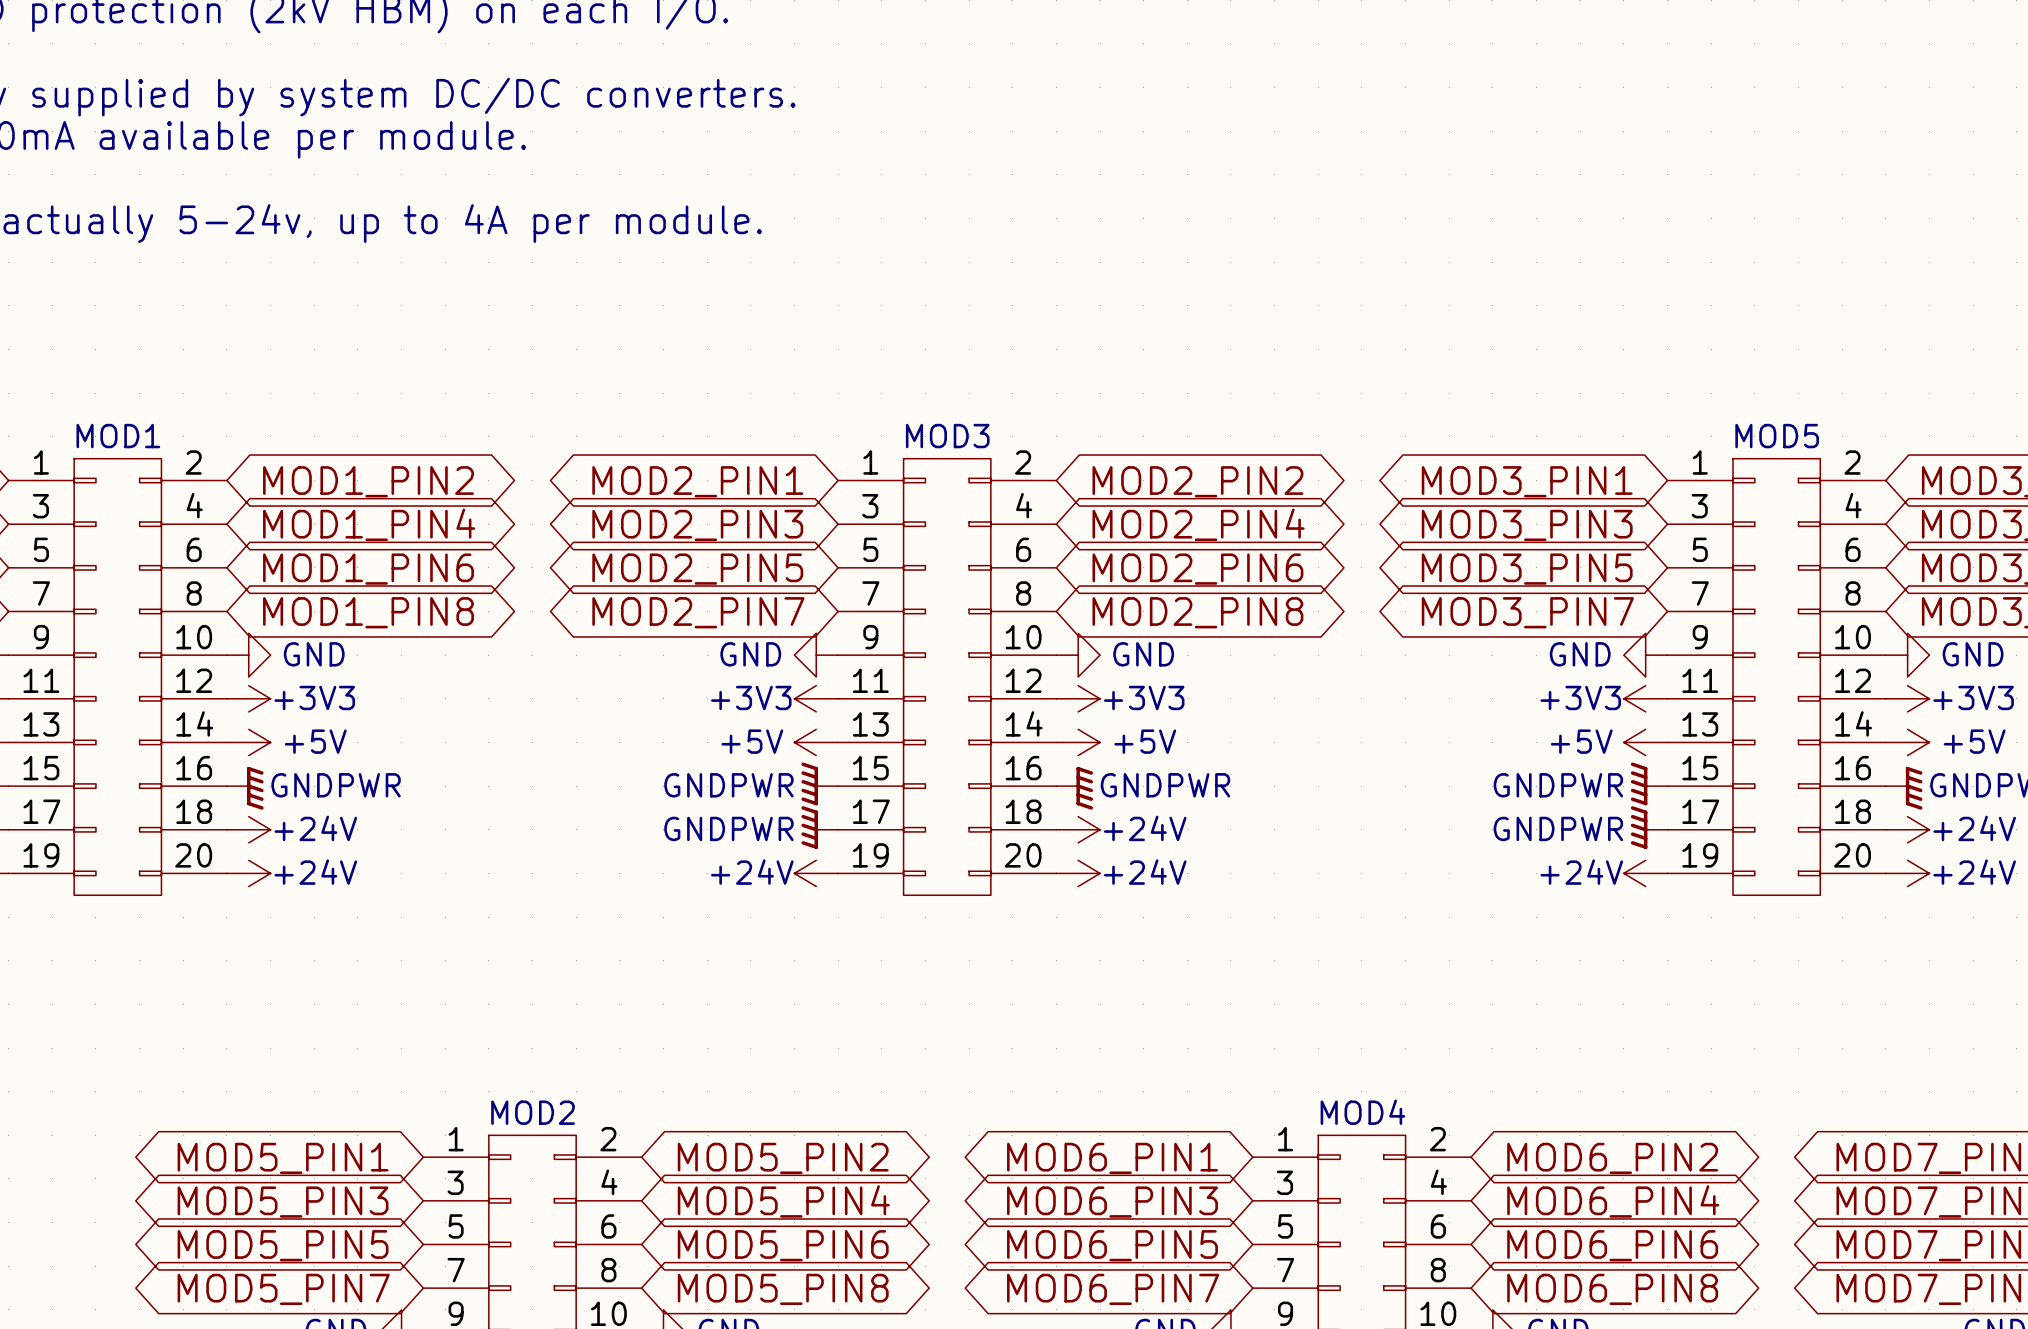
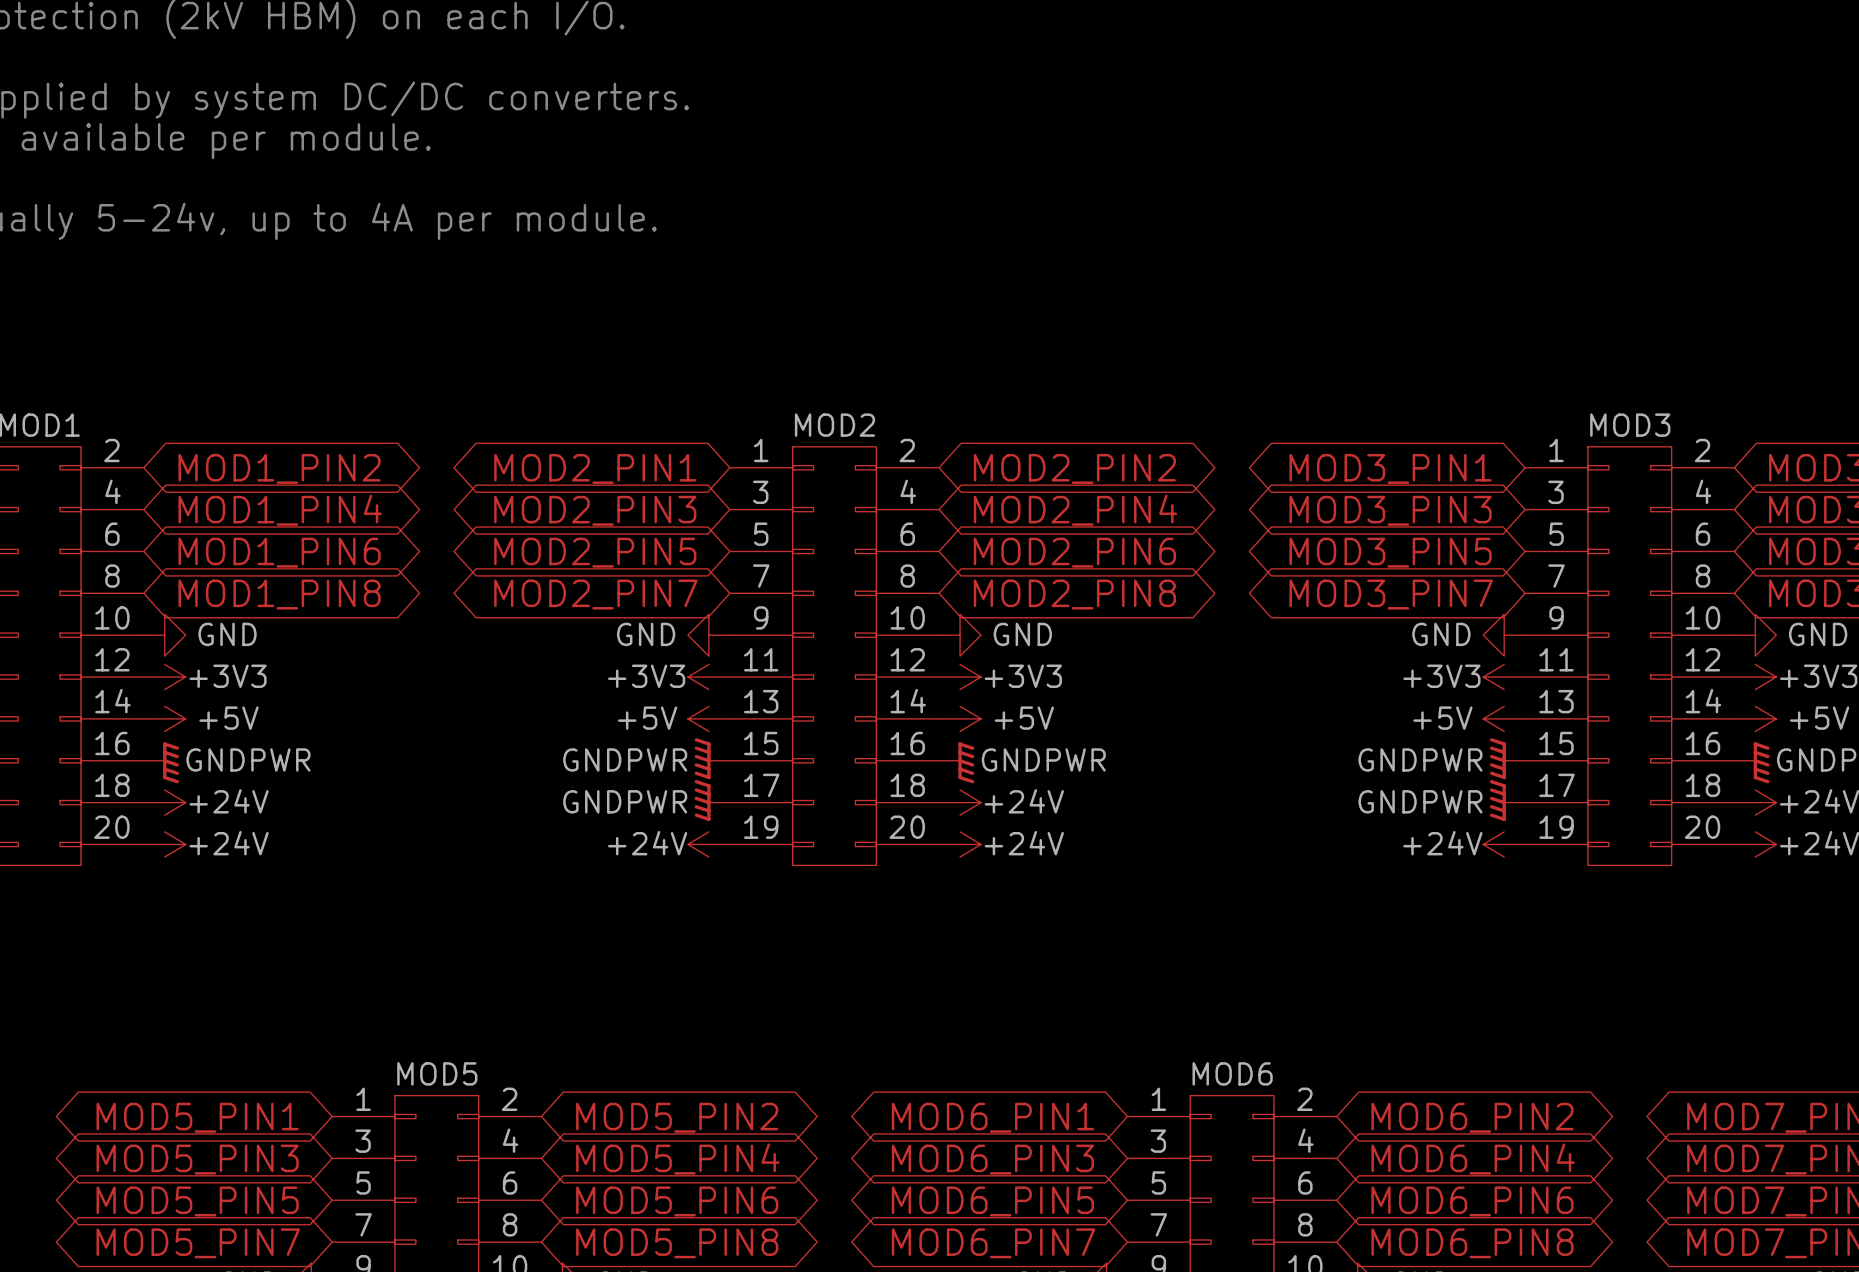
MOD3 name: MOD3 (947, 436) -> MOD2 (834, 425)
MOD5 name: MOD5 (1777, 436) -> MOD3 (1630, 425)
MOD2 name: MOD2 (533, 1112) -> MOD5 (437, 1073)
MOD4 name: MOD4 (1362, 1112) -> MOD6 (1232, 1073)

